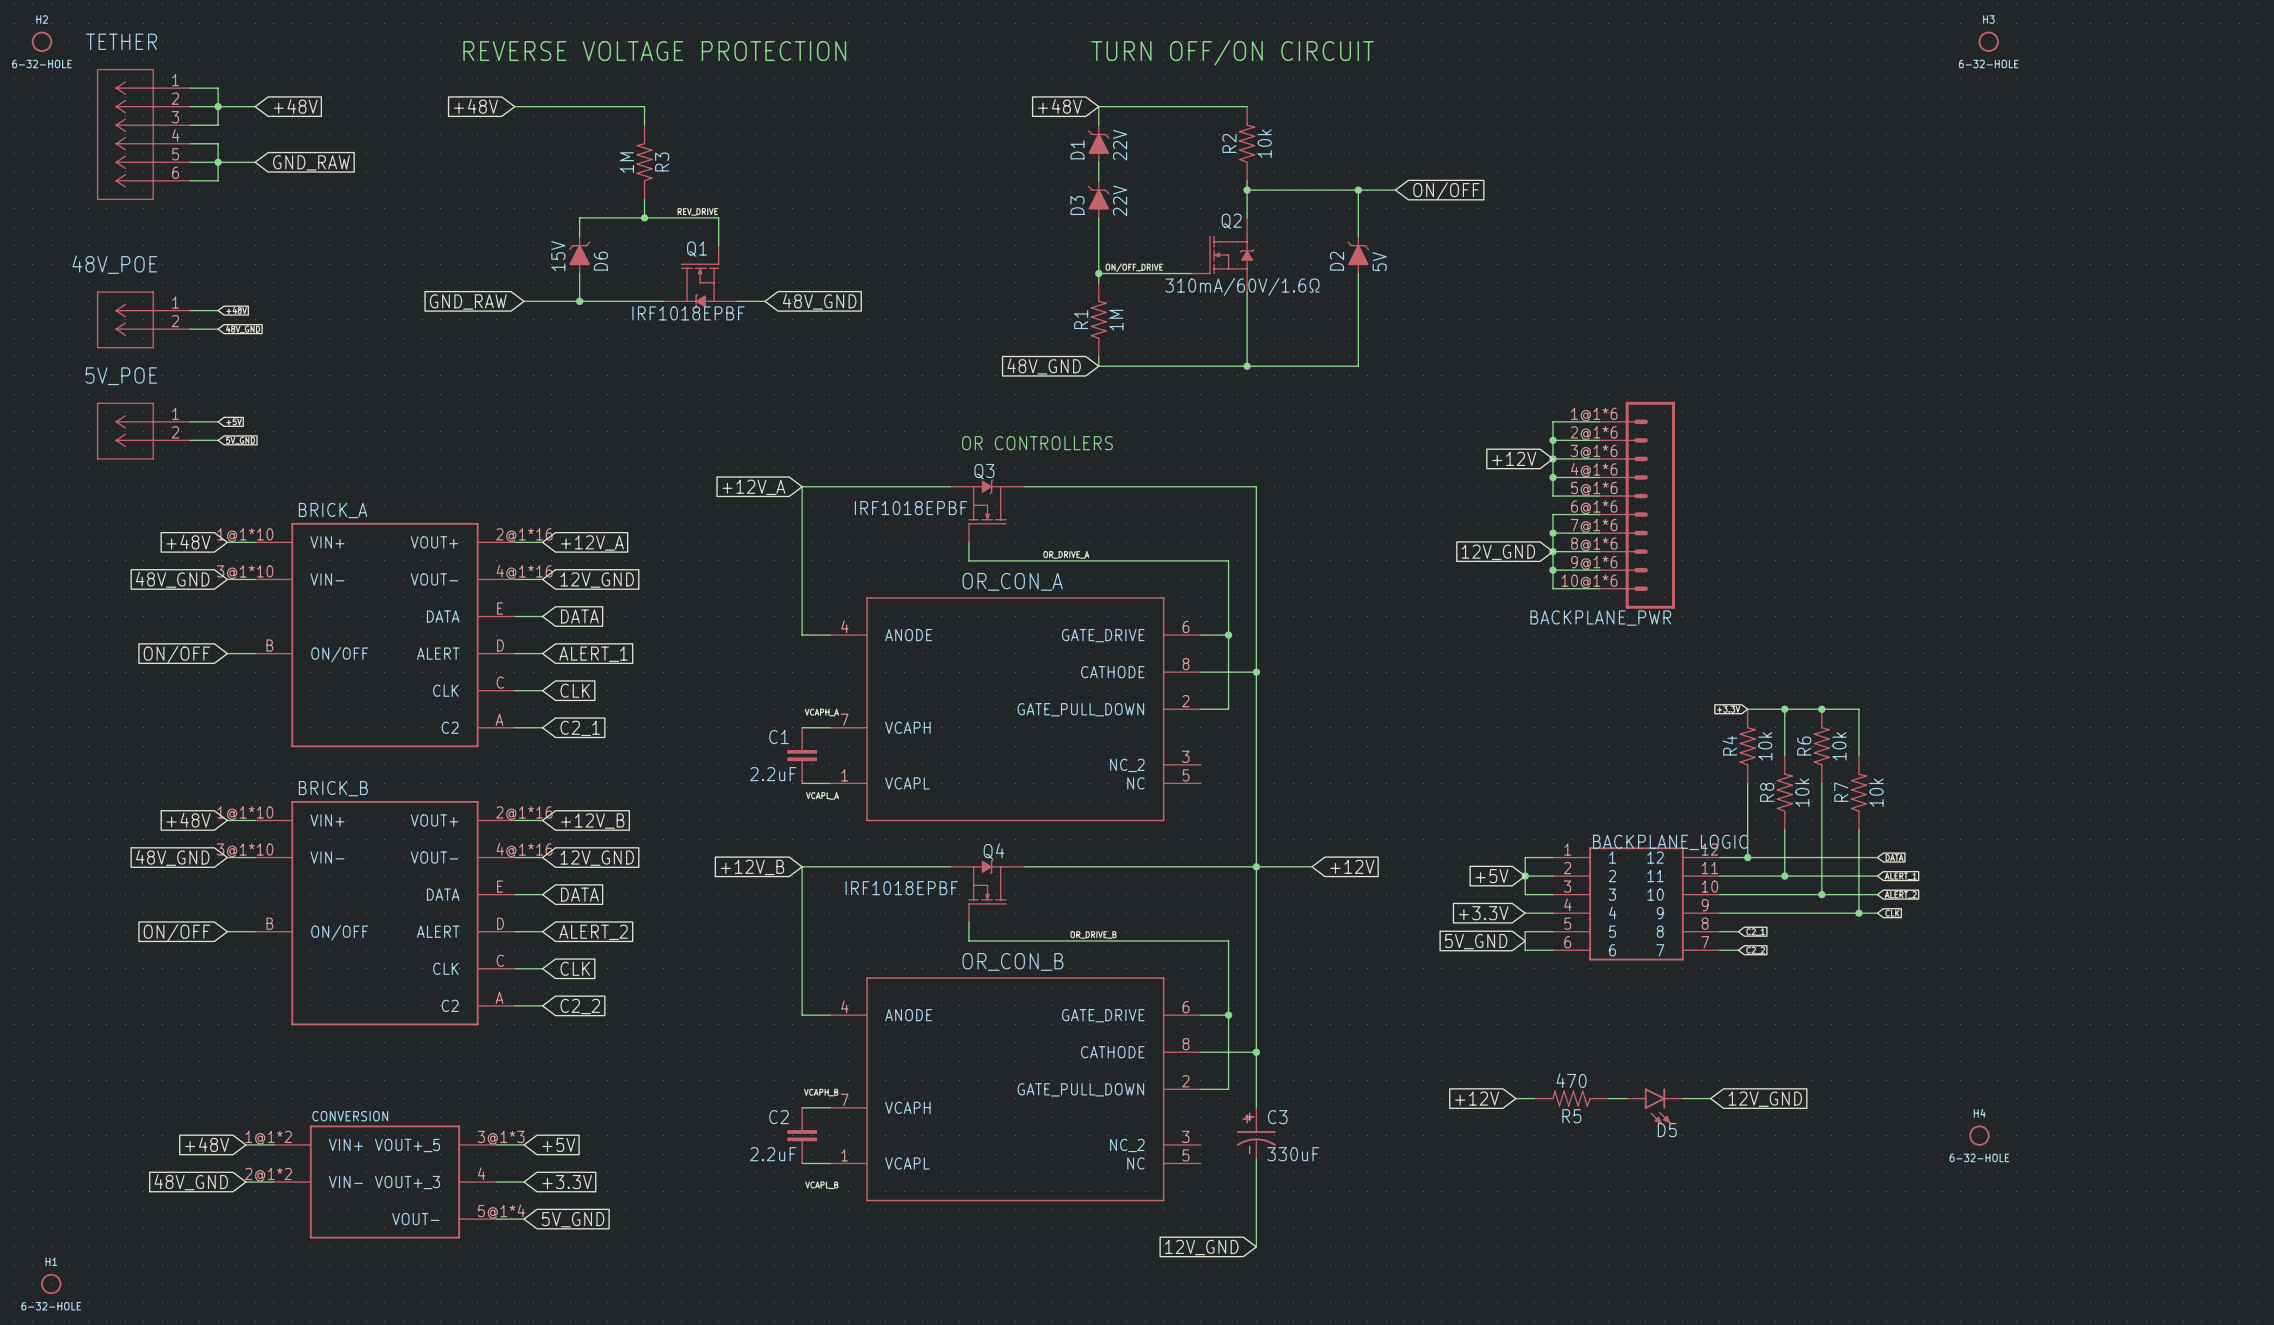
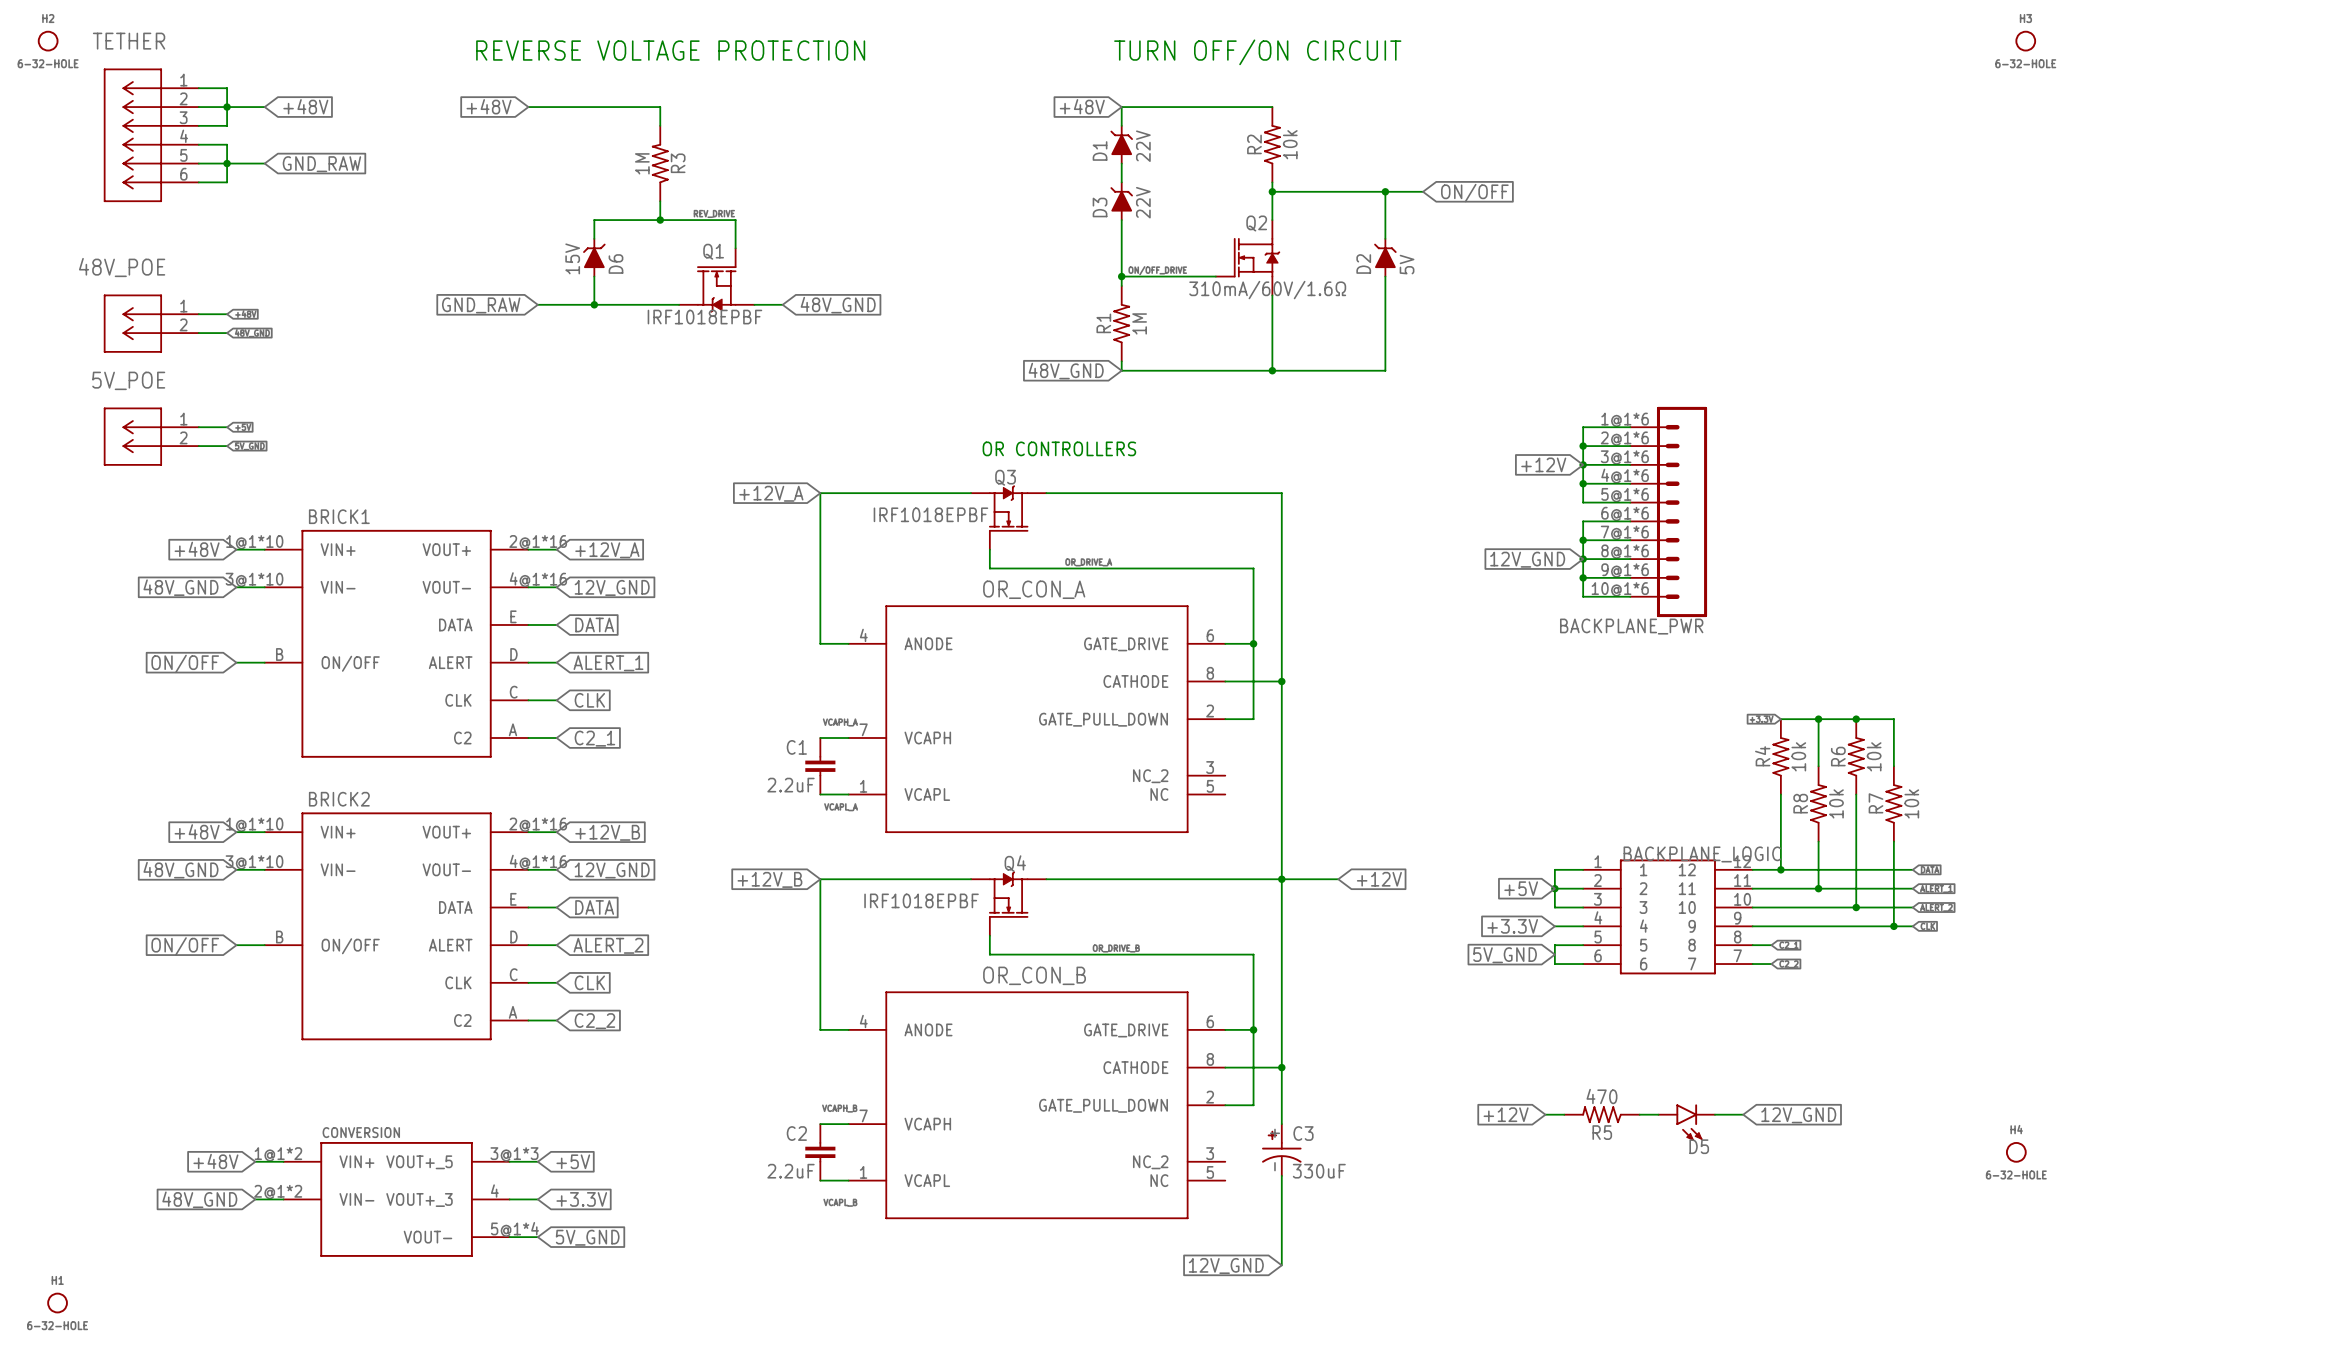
BRICK_A name: BRICK_A (333, 510) -> BRICK1 (339, 516)
BRICK_B name: BRICK_B (333, 788) -> BRICK2 (339, 799)

